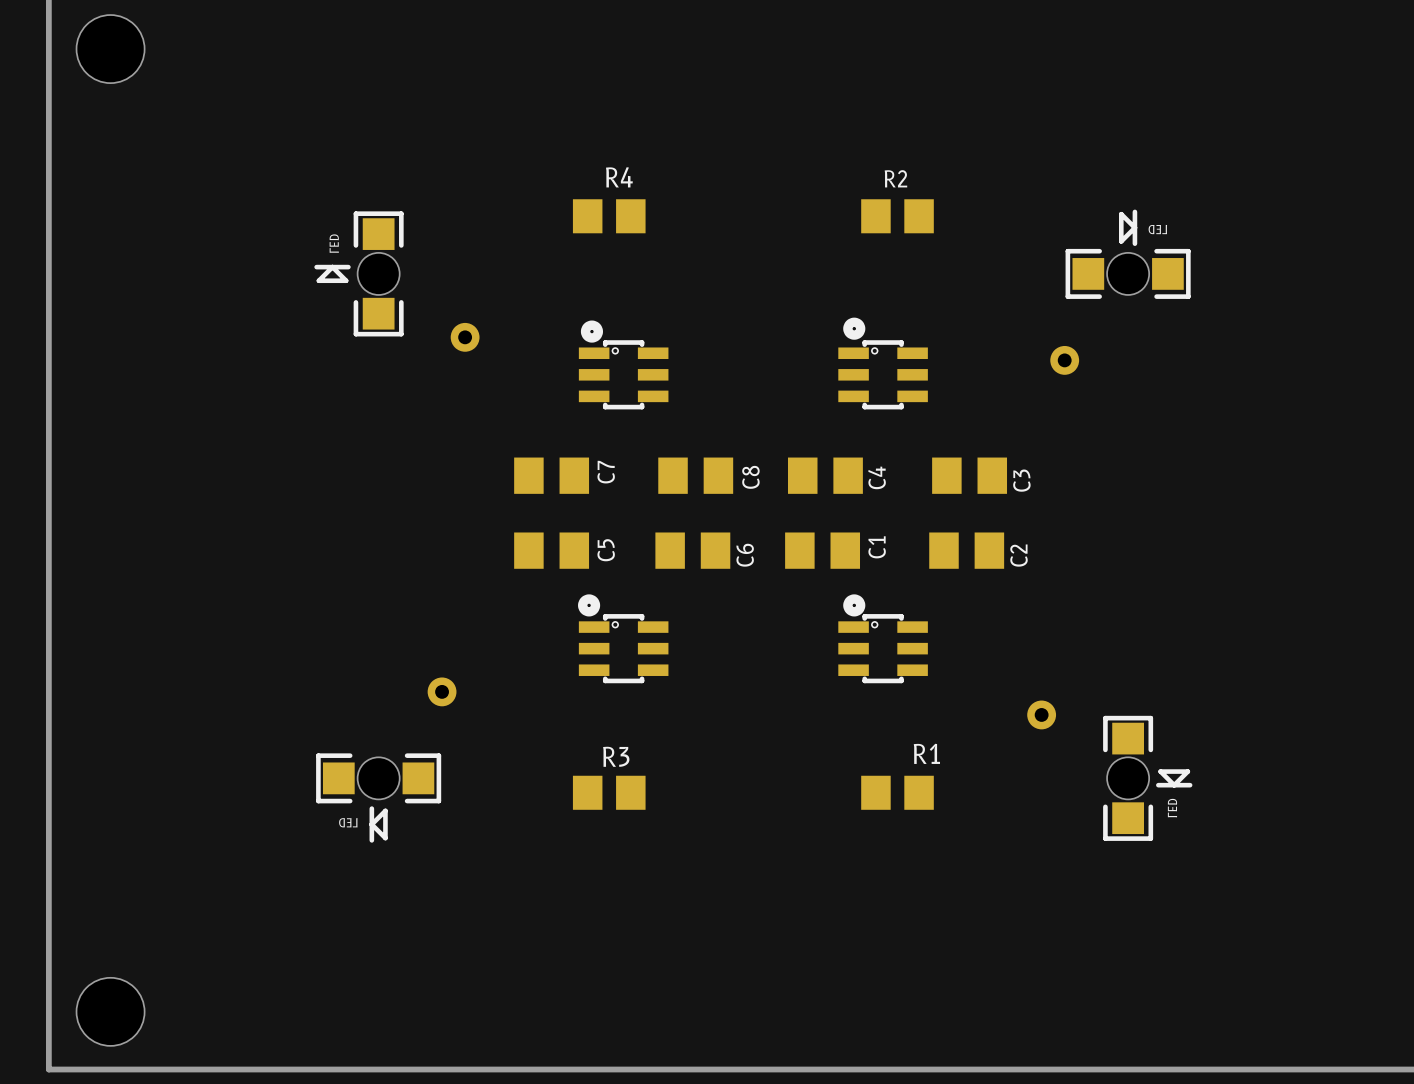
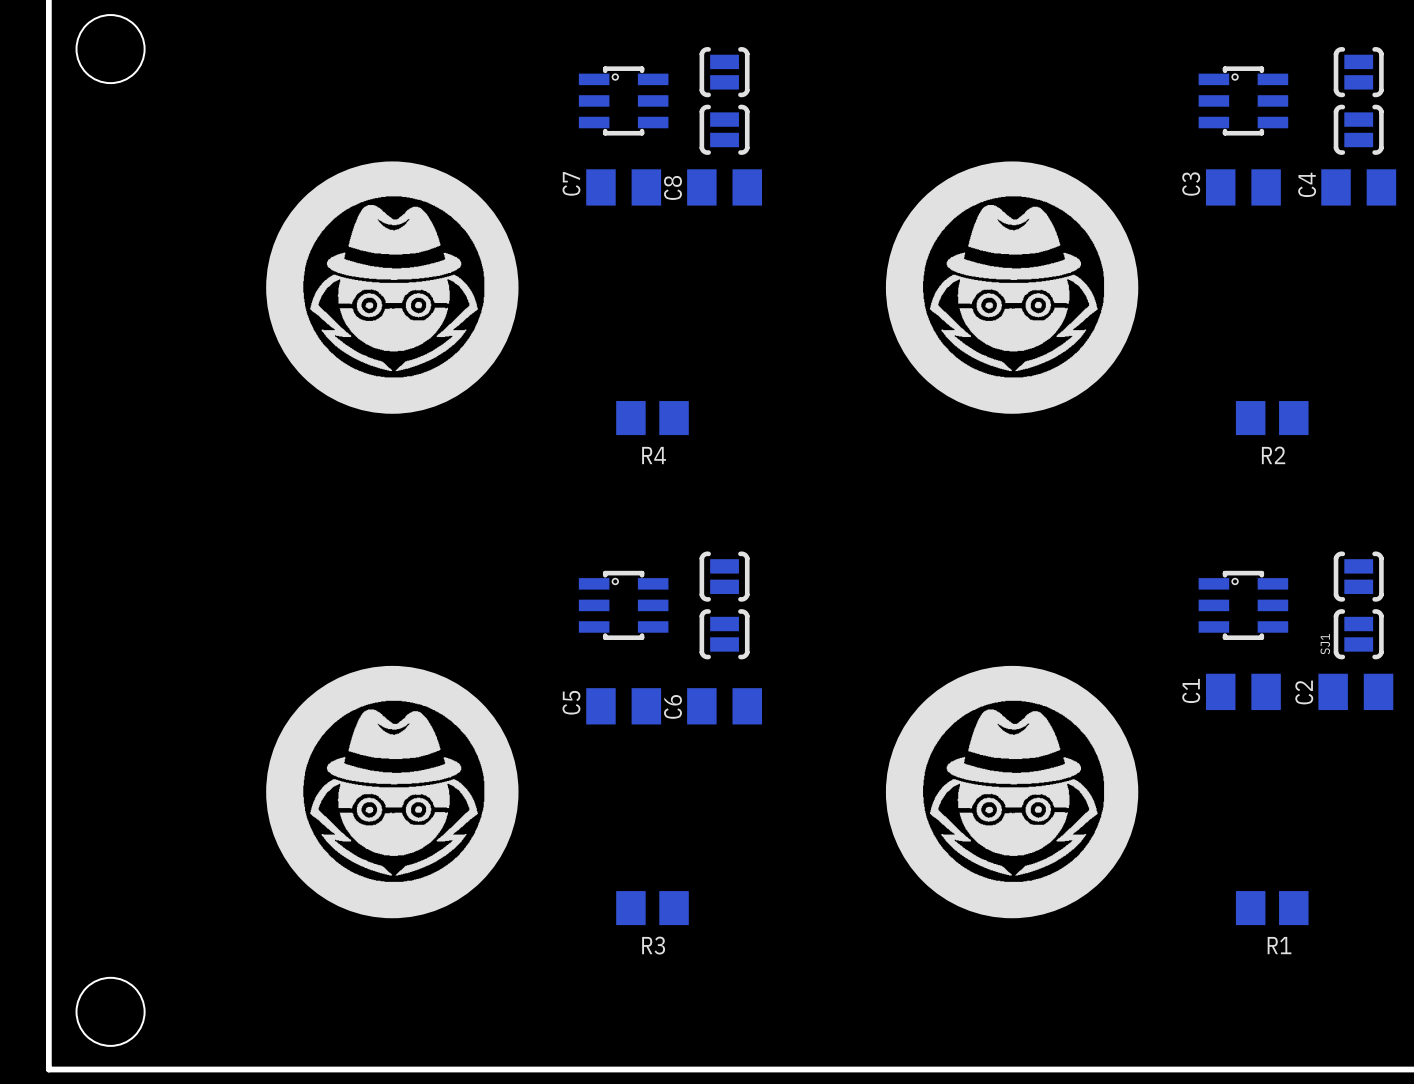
part: none -> (724, 72)
part: none -> (1358, 72)
part: none -> (623, 100)
part: none -> (1243, 100)
part: none -> (724, 129)
part: none -> (1358, 129)
R4 name position: R4 (619, 177) -> R4 (654, 455)
R2 name position: R2 (895, 178) -> R2 (1273, 455)
part footprint: [314, 211, 480, 352] -> [266, 161, 519, 414]
R4 position: (609, 216) -> (652, 418)
R2 position: (897, 216) -> (1272, 418)
part: none -> (1012, 287)
part: (1120, 292) -> none
drawing: [843, 317, 866, 340] -> none
drawing: [580, 320, 604, 343] -> none
part: (623, 374) -> none
part: (883, 374) -> none
C7 name position: C7 (606, 472) -> C7 (571, 183)
C7 position: (551, 475) -> (623, 187)
C8 position: (695, 475) -> (724, 187)
C4 position: (825, 475) -> (1358, 187)
C3 position: (969, 475) -> (1243, 187)
C8 name position: C8 (750, 477) -> C8 (672, 187)
C4 name position: C4 (877, 477) -> C4 (1307, 184)
C3 name position: C3 (1021, 480) -> C3 (1191, 184)
C1 name position: C1 (877, 547) -> C1 (1191, 690)
C5 position: (551, 550) -> (623, 706)
C5 name position: C5 (606, 550) -> C5 (571, 702)
C6 position: (692, 550) -> (724, 706)
C1 position: (822, 550) -> (1243, 691)
C2 position: (966, 550) -> (1355, 691)
C6 name position: C6 (745, 555) -> C6 (672, 706)
C2 name position: C2 (1019, 555) -> C2 (1304, 692)
part: none -> (724, 576)
part: none -> (1358, 576)
drawing: [578, 594, 601, 617] -> none
drawing: [843, 594, 866, 617] -> none
part: none -> (1243, 605)
part: none -> (724, 634)
SJ1: none -> (1358, 634)
part position: (623, 648) -> (623, 605)
part: (883, 648) -> none
R1 name position: R1 (926, 753) -> R1 (1279, 945)
R3 name position: R3 (616, 756) -> R3 (653, 945)
part: (386, 760) -> none
part: (1109, 770) -> none
part: none -> (392, 792)
R3 position: (609, 792) -> (652, 908)
R1 position: (897, 792) -> (1272, 908)
part: none -> (1012, 792)

